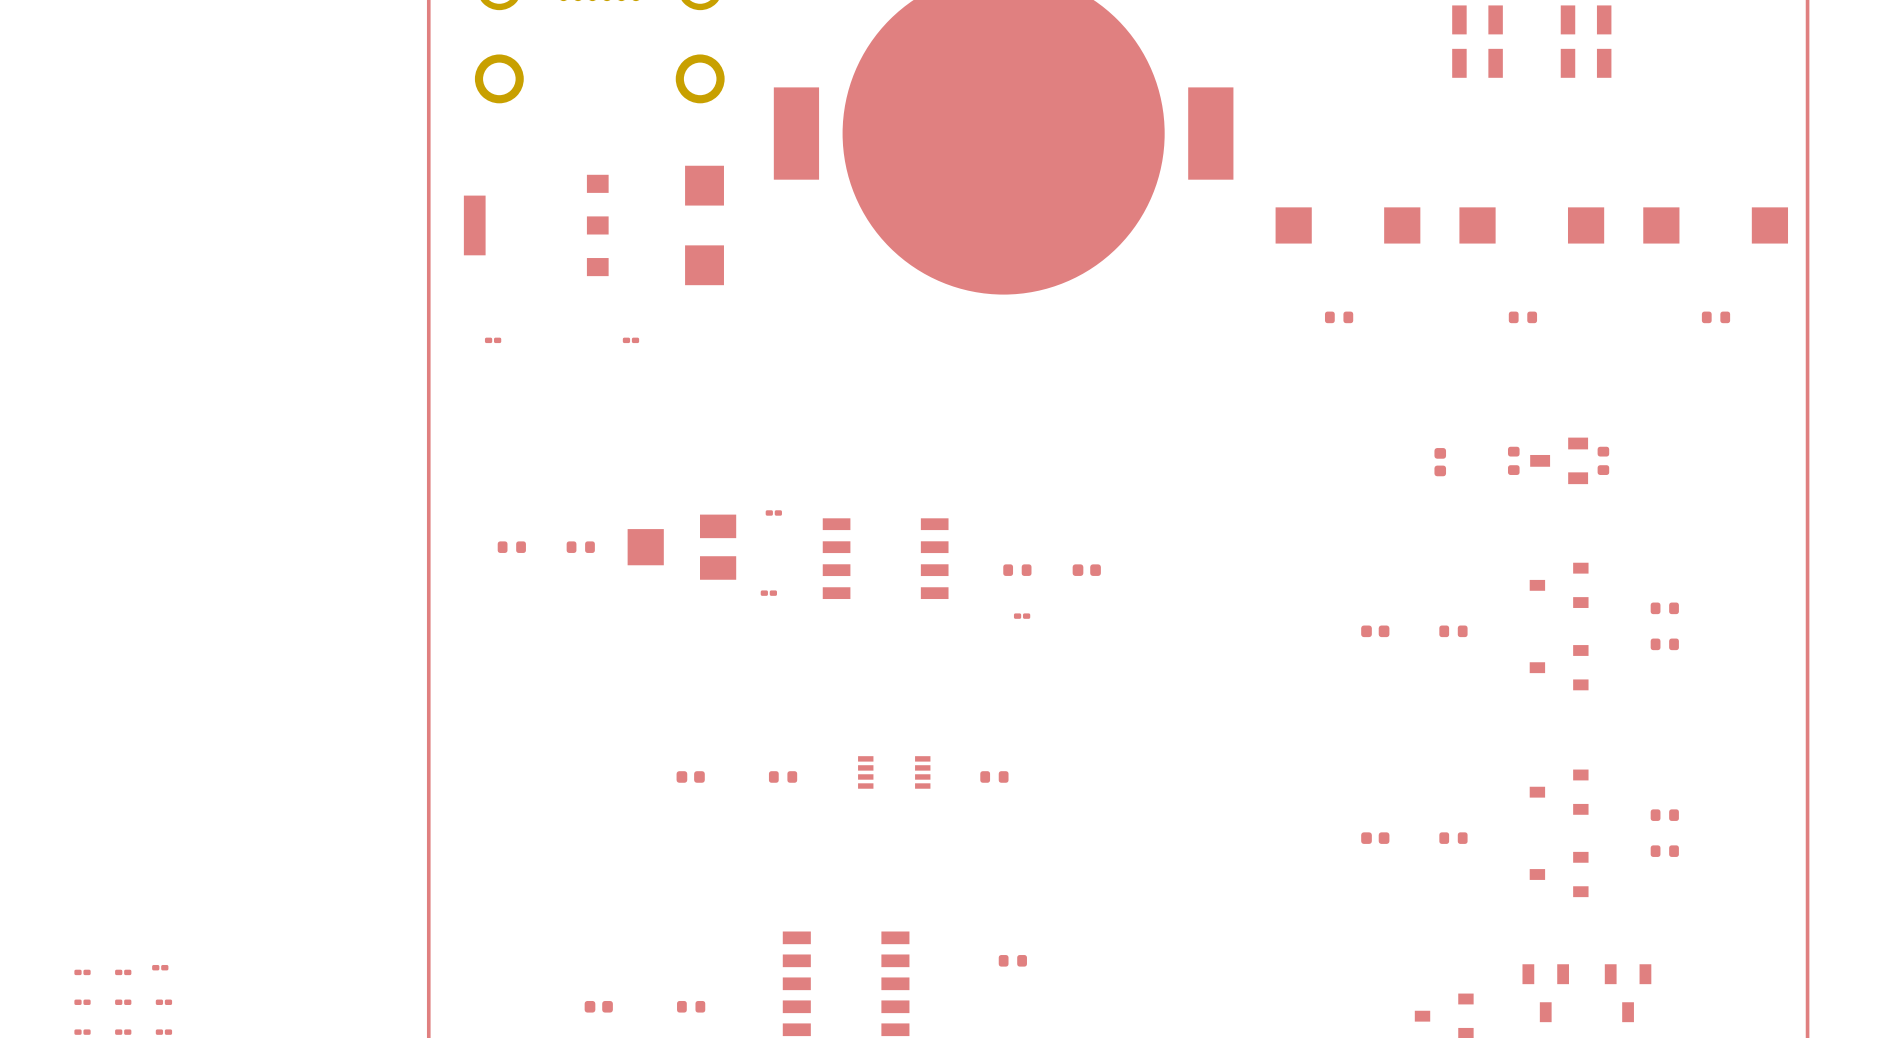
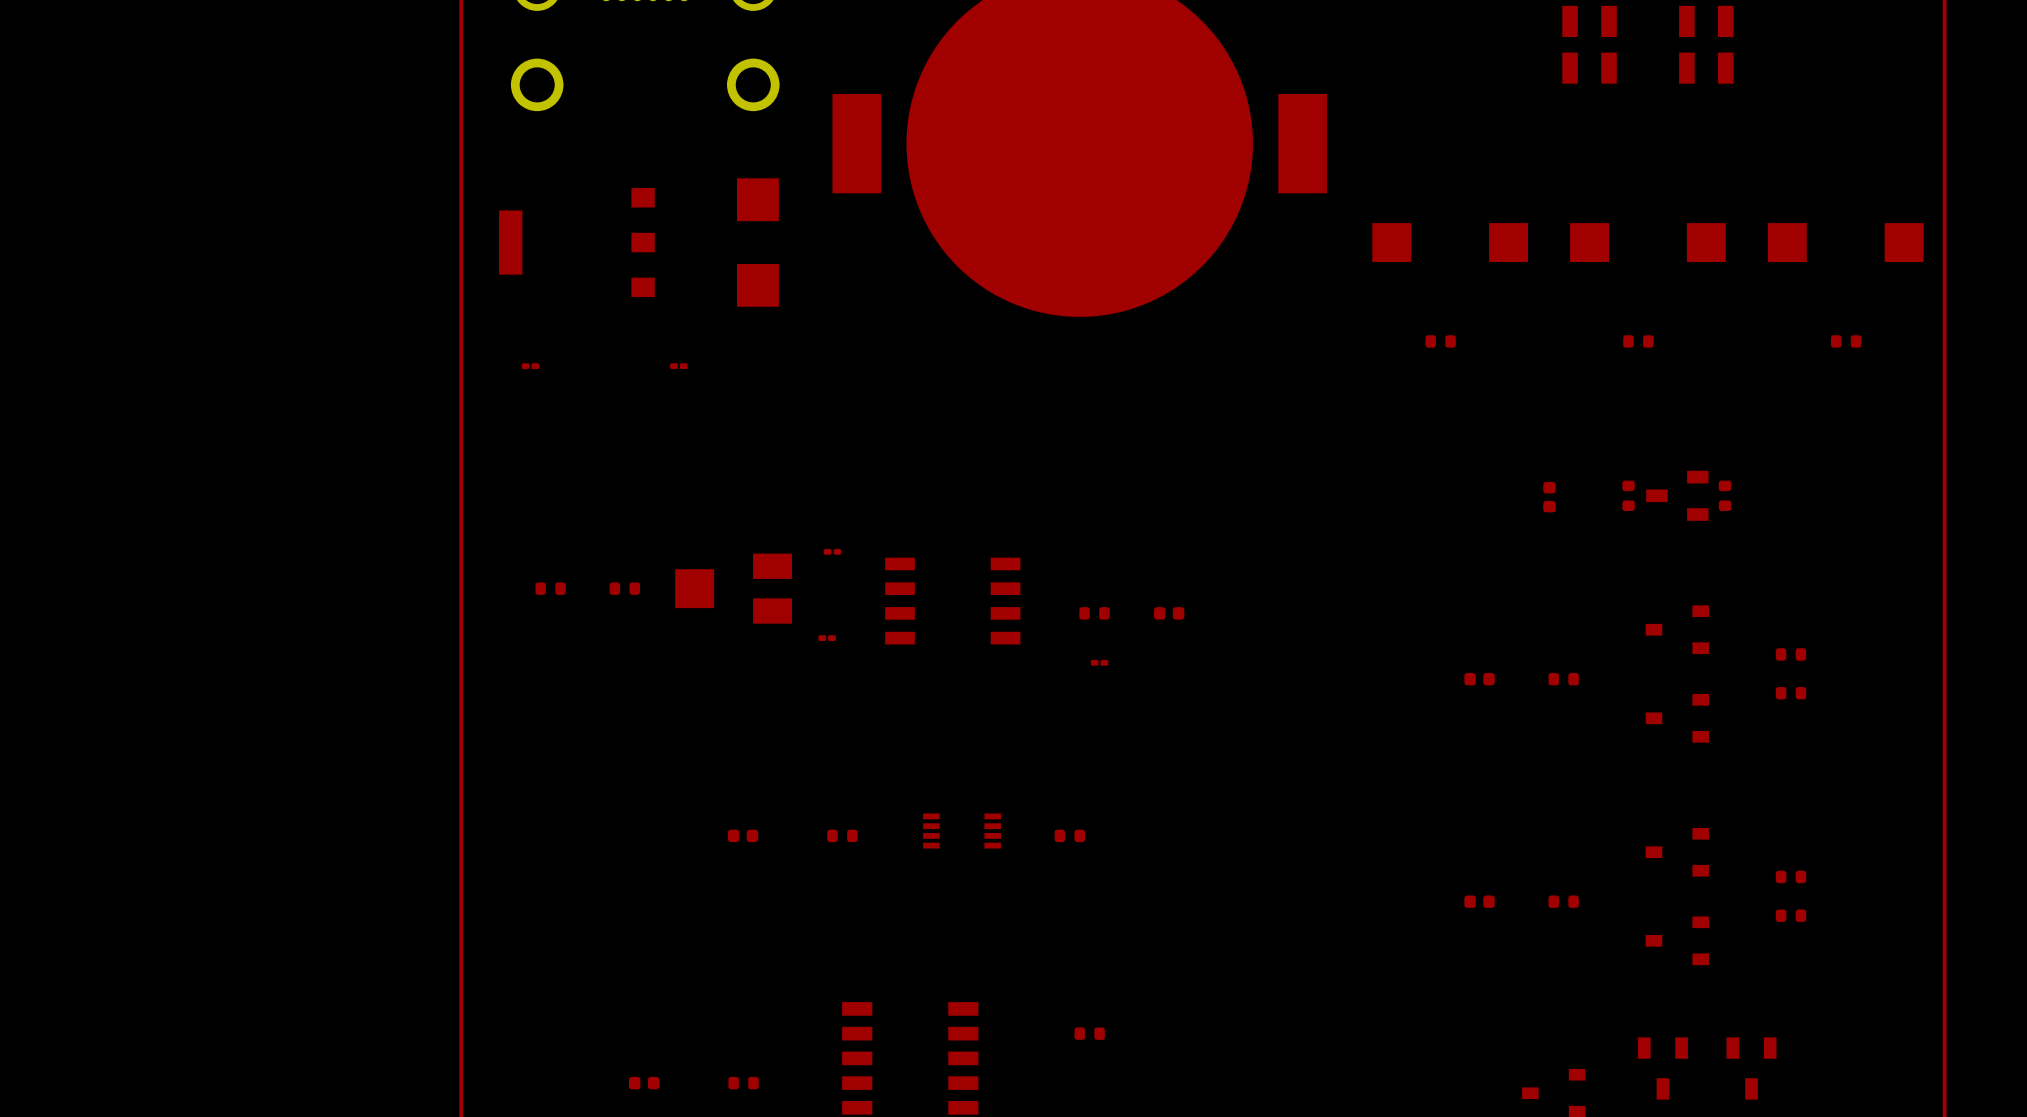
part: (160, 967) -> none
part: (82, 972) -> none
part: (123, 972) -> none
part: (82, 1002) -> none
part: (123, 1002) -> none
part: (163, 1002) -> none
part: (82, 1032) -> none
part: (123, 1032) -> none
part: (163, 1032) -> none

